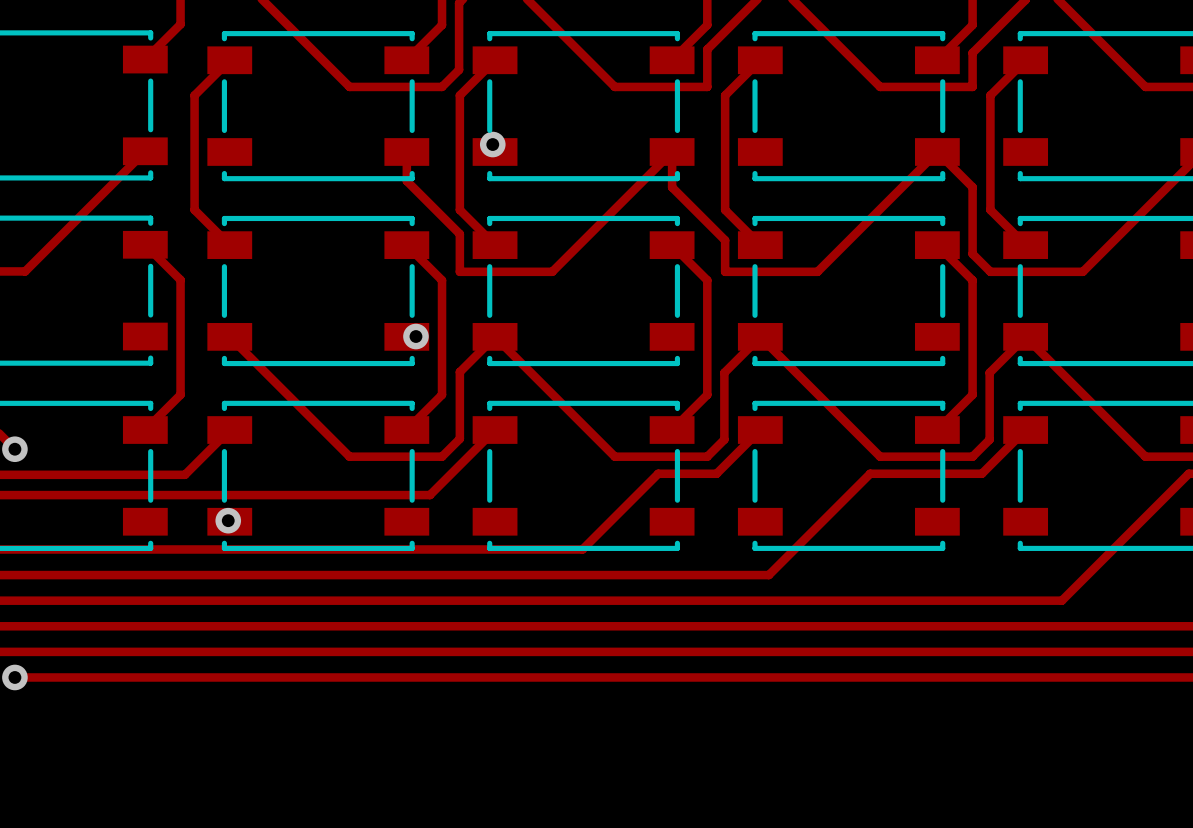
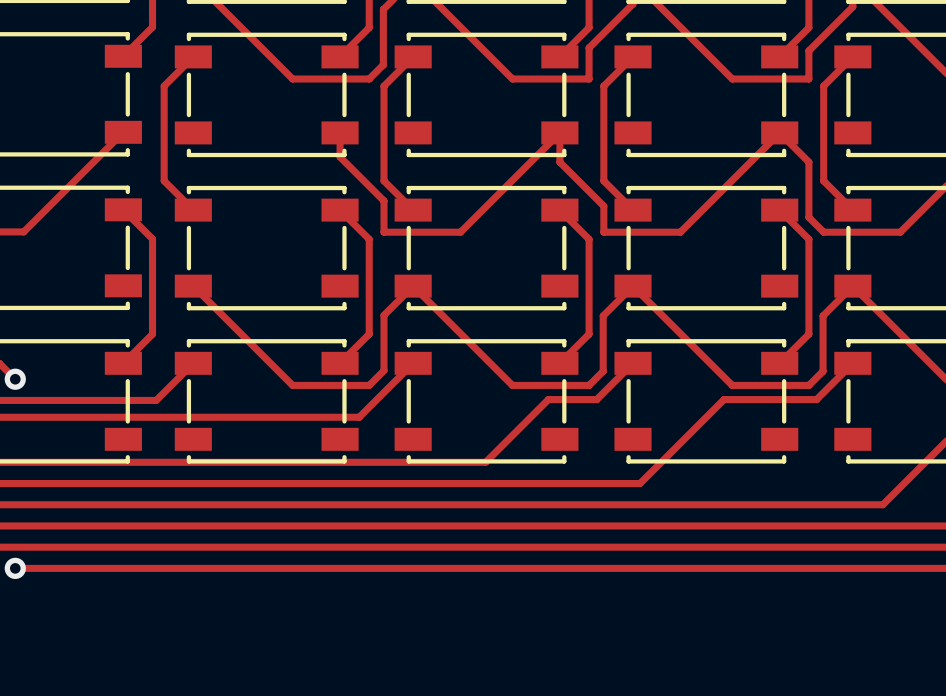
via: (492, 144) -> none
via: (415, 336) -> none
via: (228, 520) -> none

